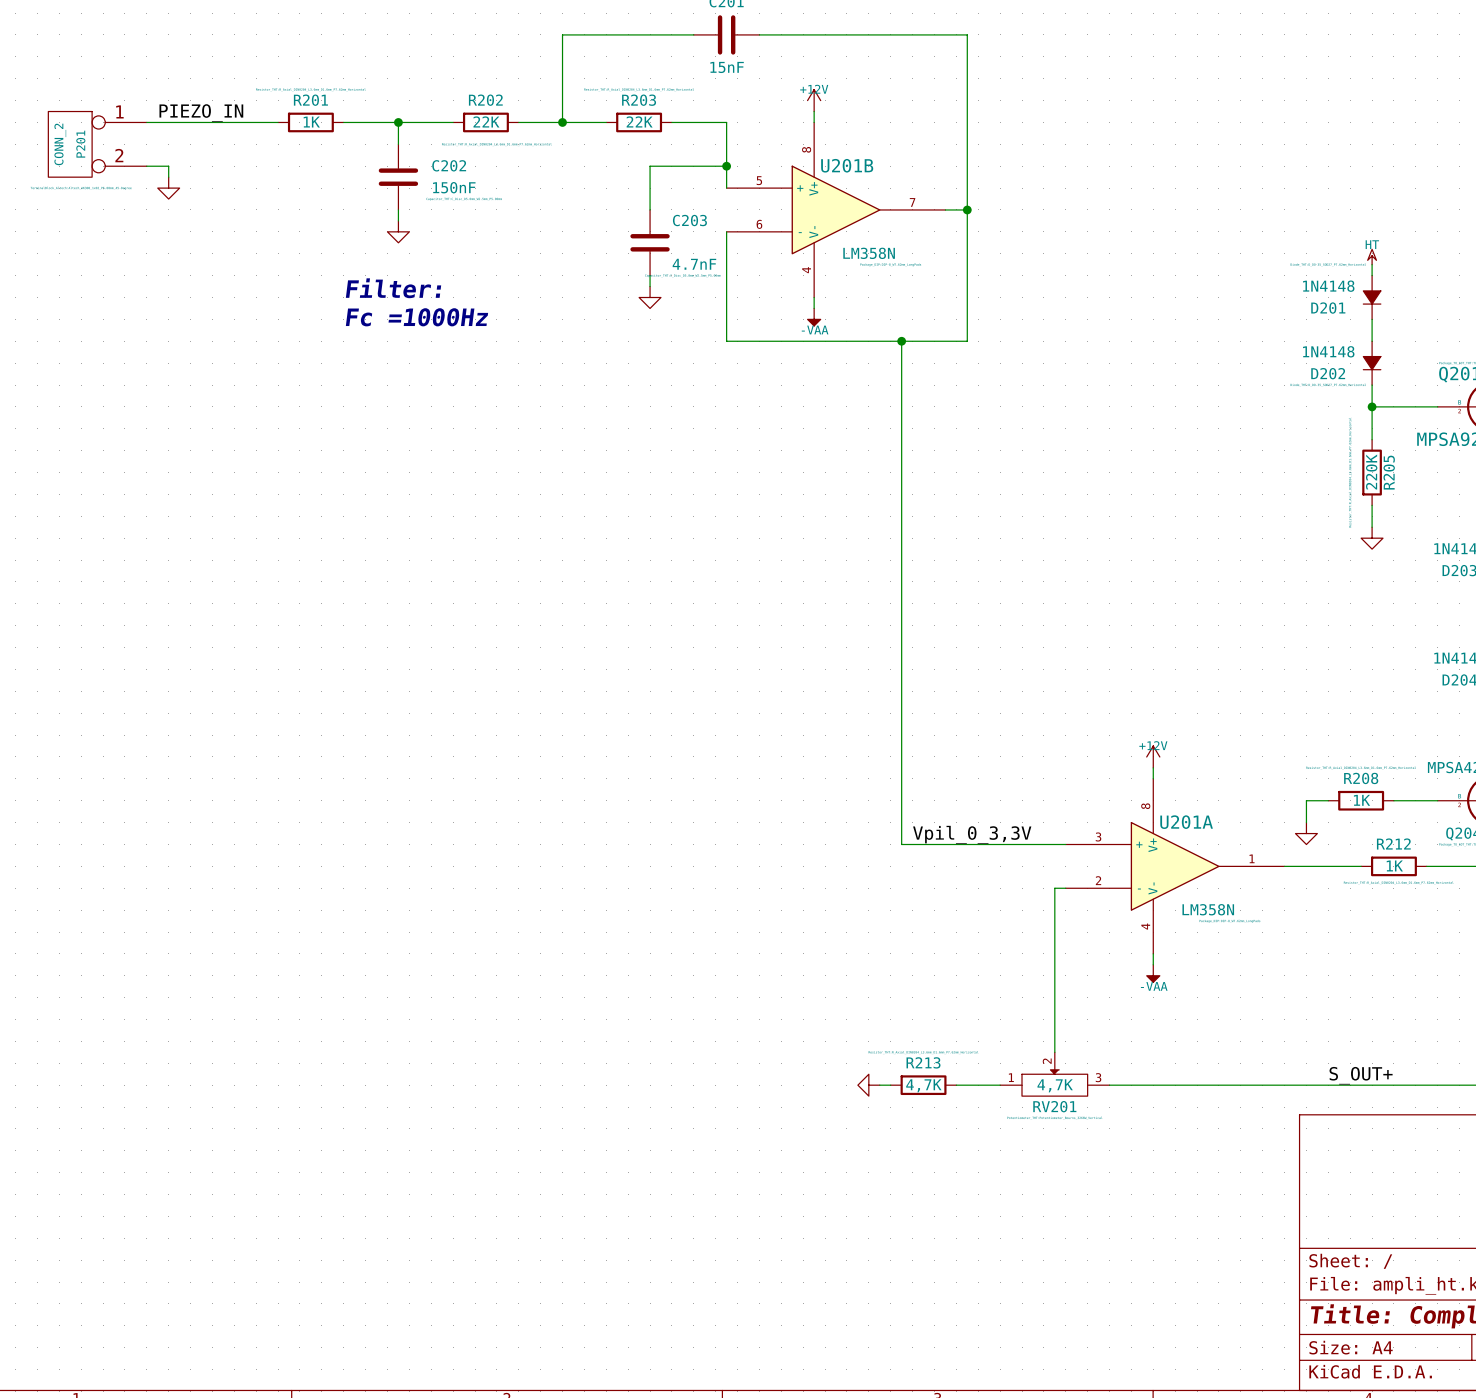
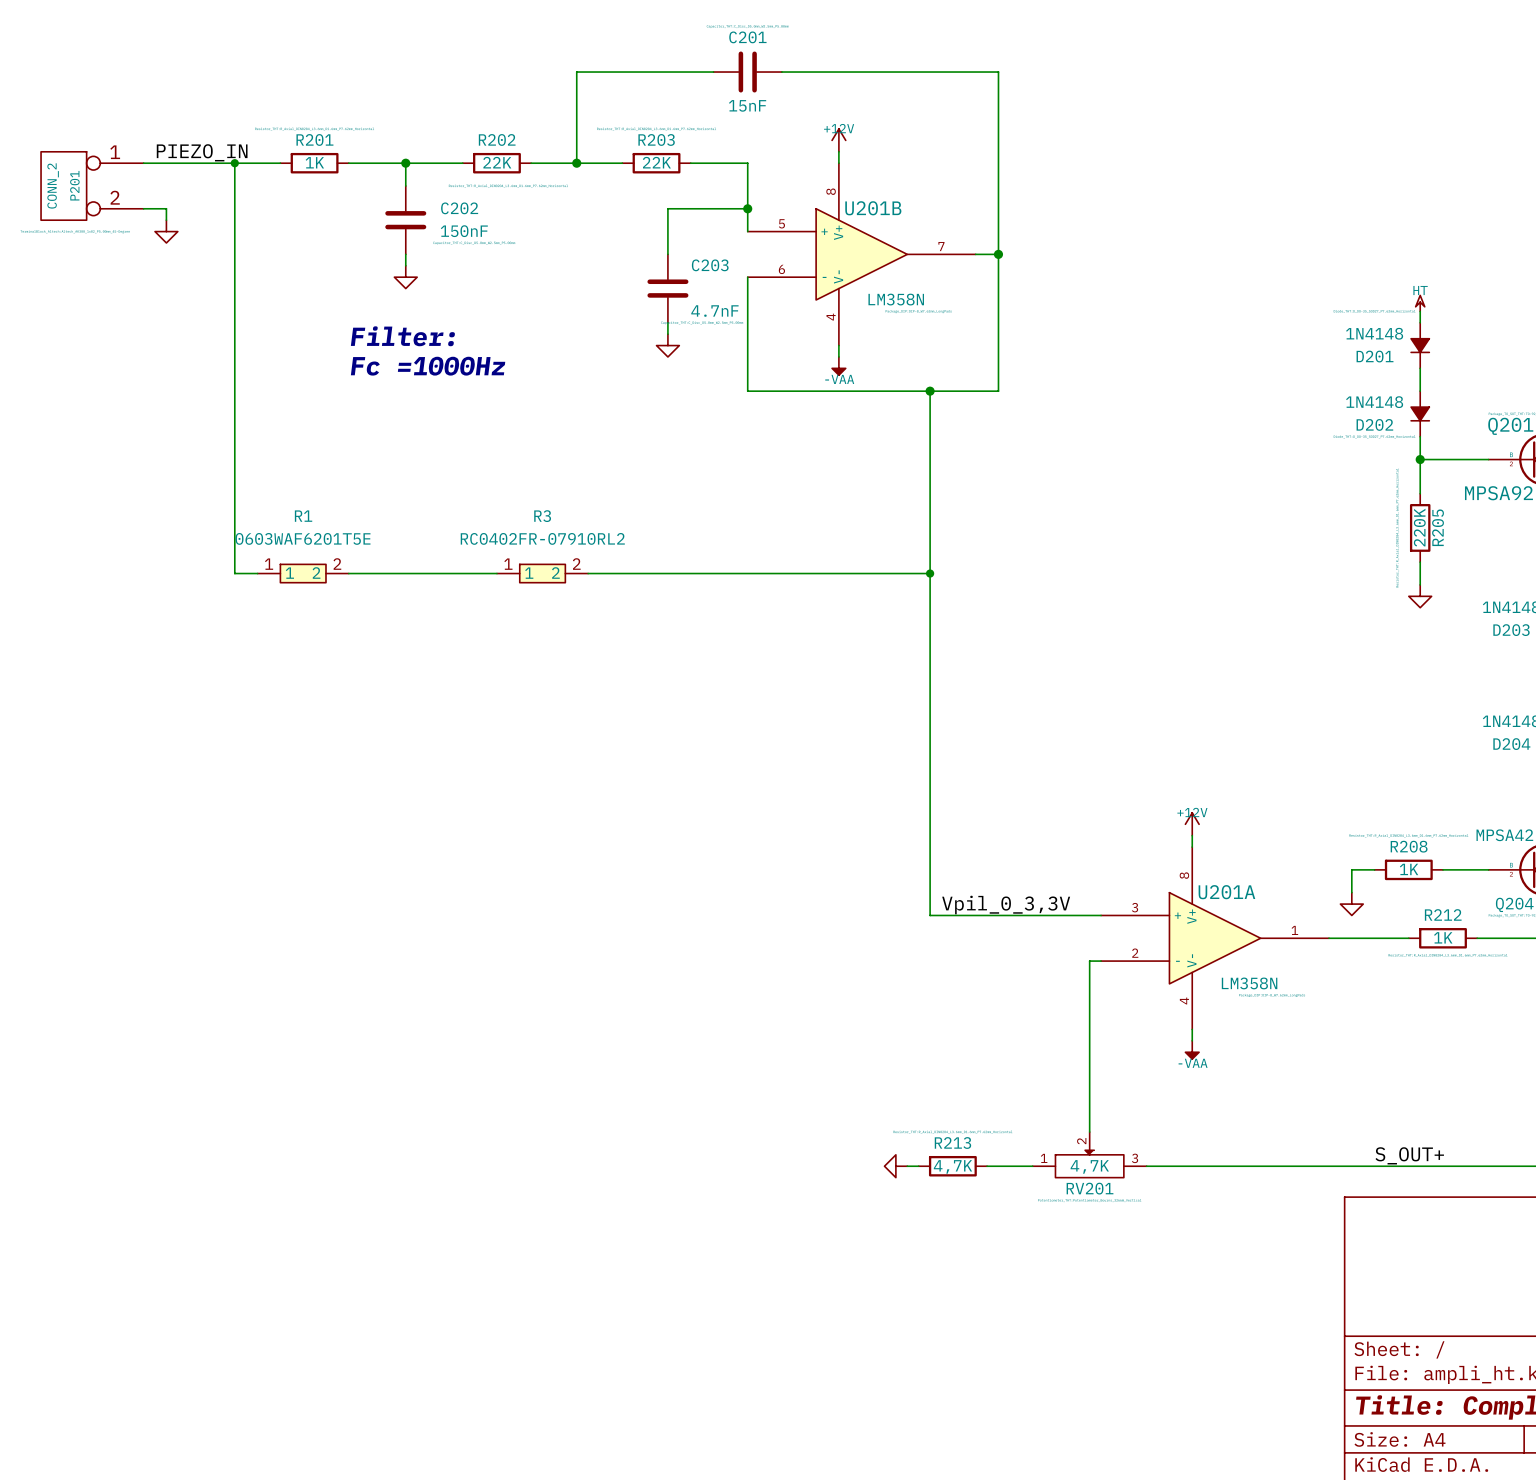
wire: none -> (234, 163) (234, 573) (257, 573)
junction: none -> (234, 163)
R1: none -> 0603WAF6201T5E (303, 573)
wire: none -> (348, 573) (496, 573)
R3: none -> RC0402FR-07910RL2 (542, 573)
wire: none -> (588, 573) (930, 573)
junction: none -> (930, 573)

